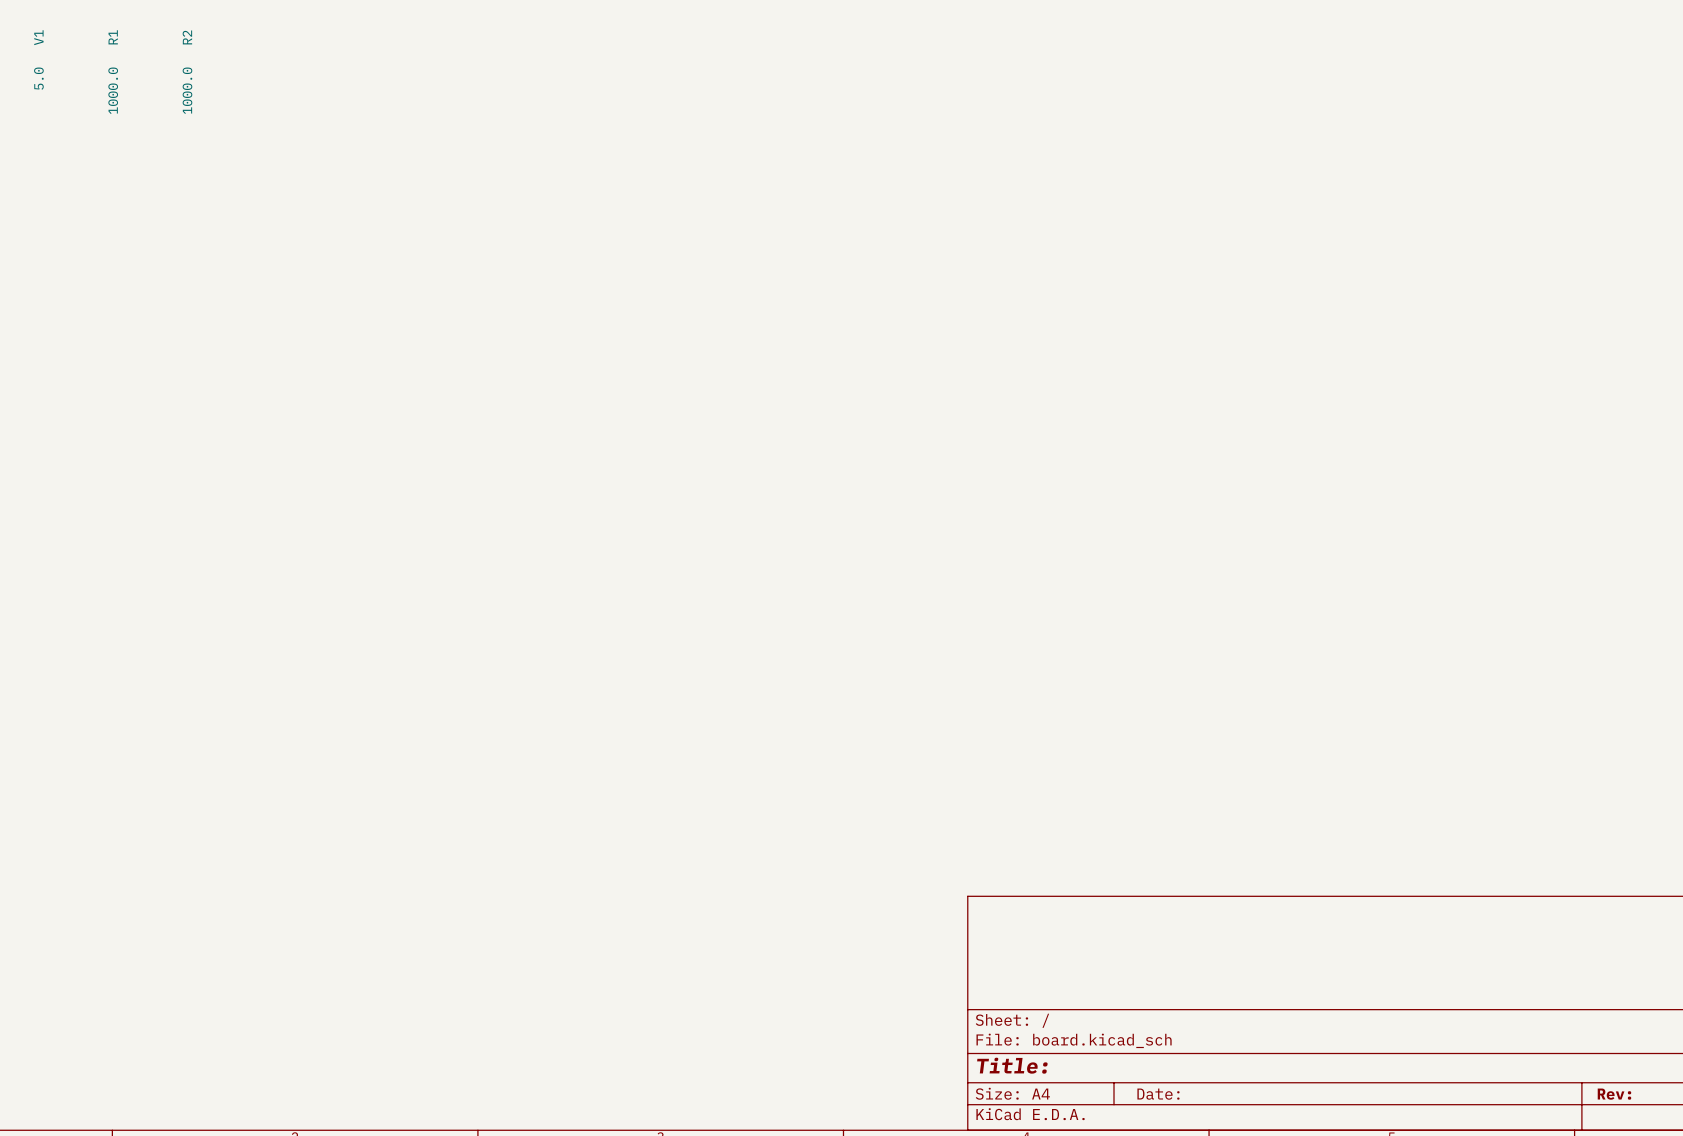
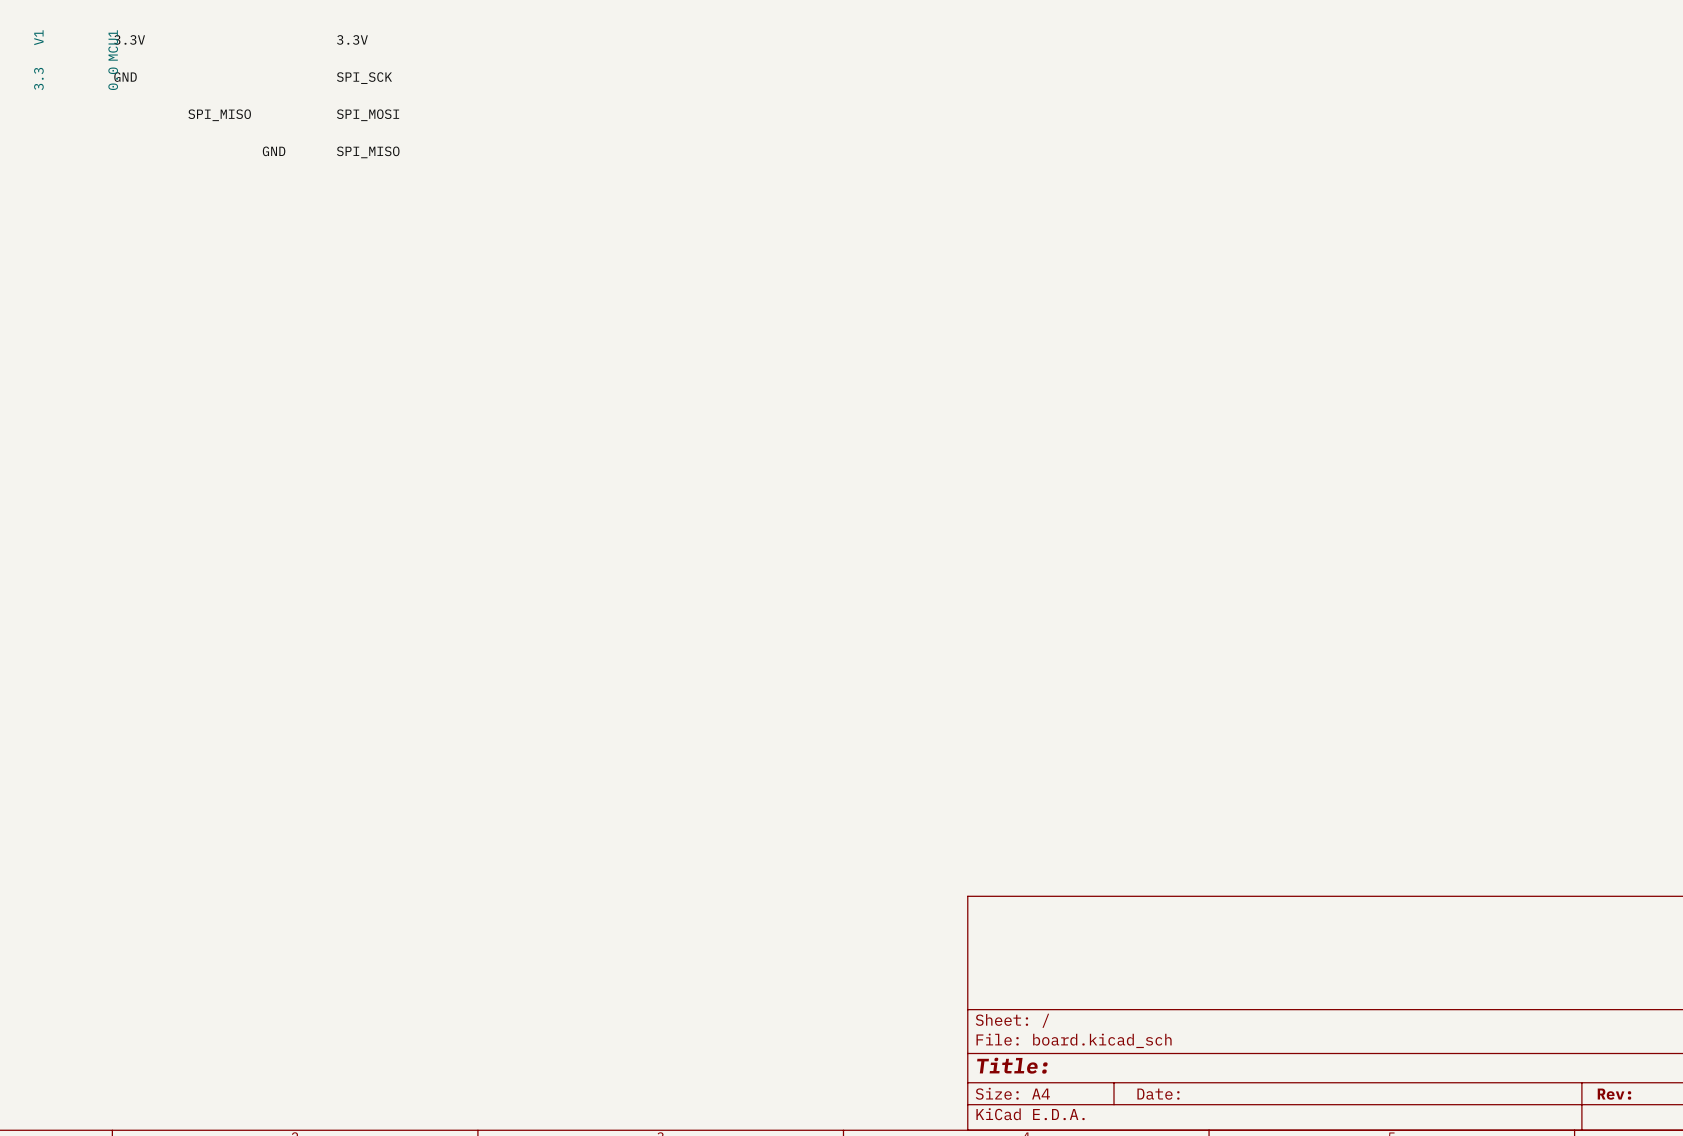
label: none -> 3.3V (129, 39)
label: none -> 3.3V (352, 39)
MCU1: none -> 0.0 (113, 60)
R1: 1000.0 (113, 72) -> none
R2: 1000.0 (187, 72) -> none
label: none -> GND (125, 77)
V1 value: 5.0 (38, 78) -> 3.3 (38, 78)
label: none -> SPI_SCK (364, 78)
label: none -> SPI_MISO (219, 115)
label: none -> SPI_MOSI (368, 115)
label: none -> GND (274, 151)
label: none -> SPI_MISO (368, 152)

